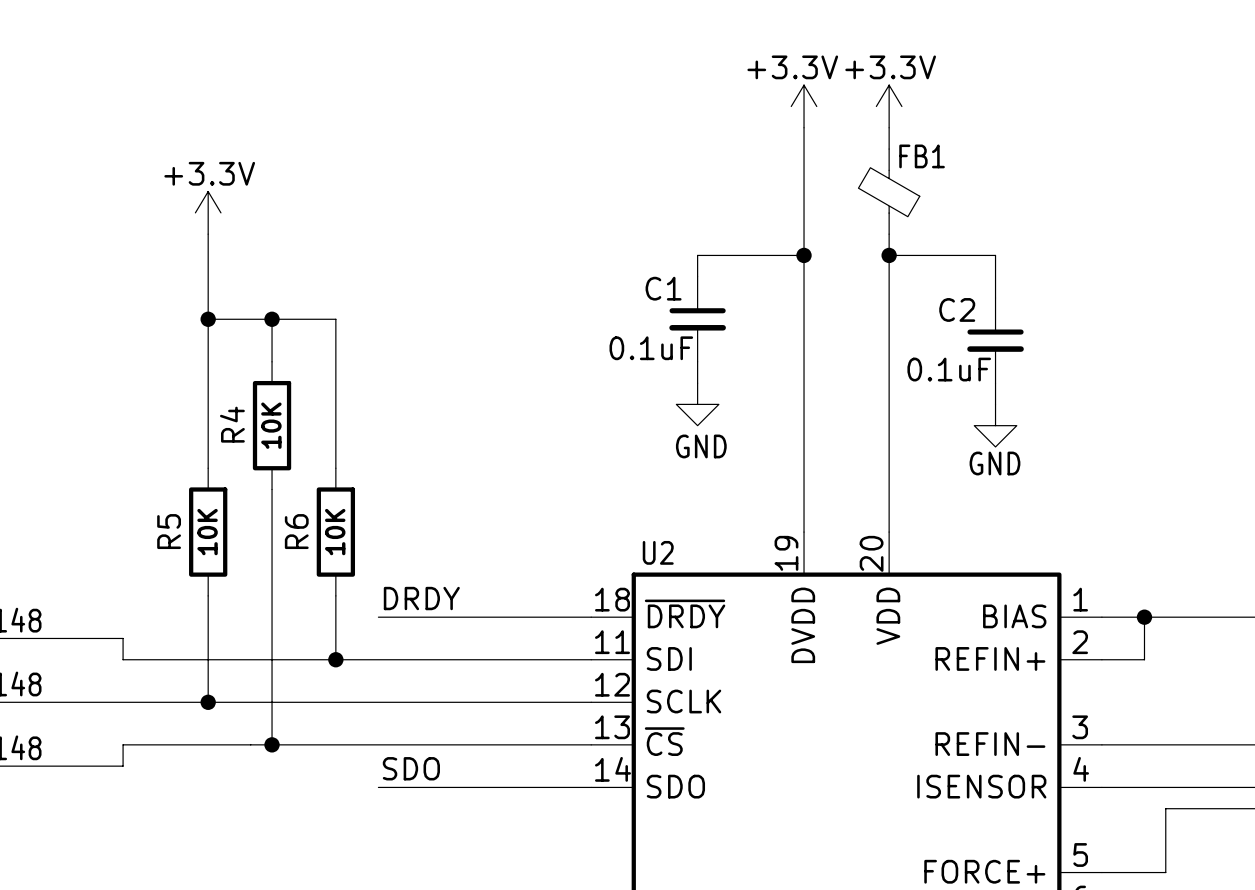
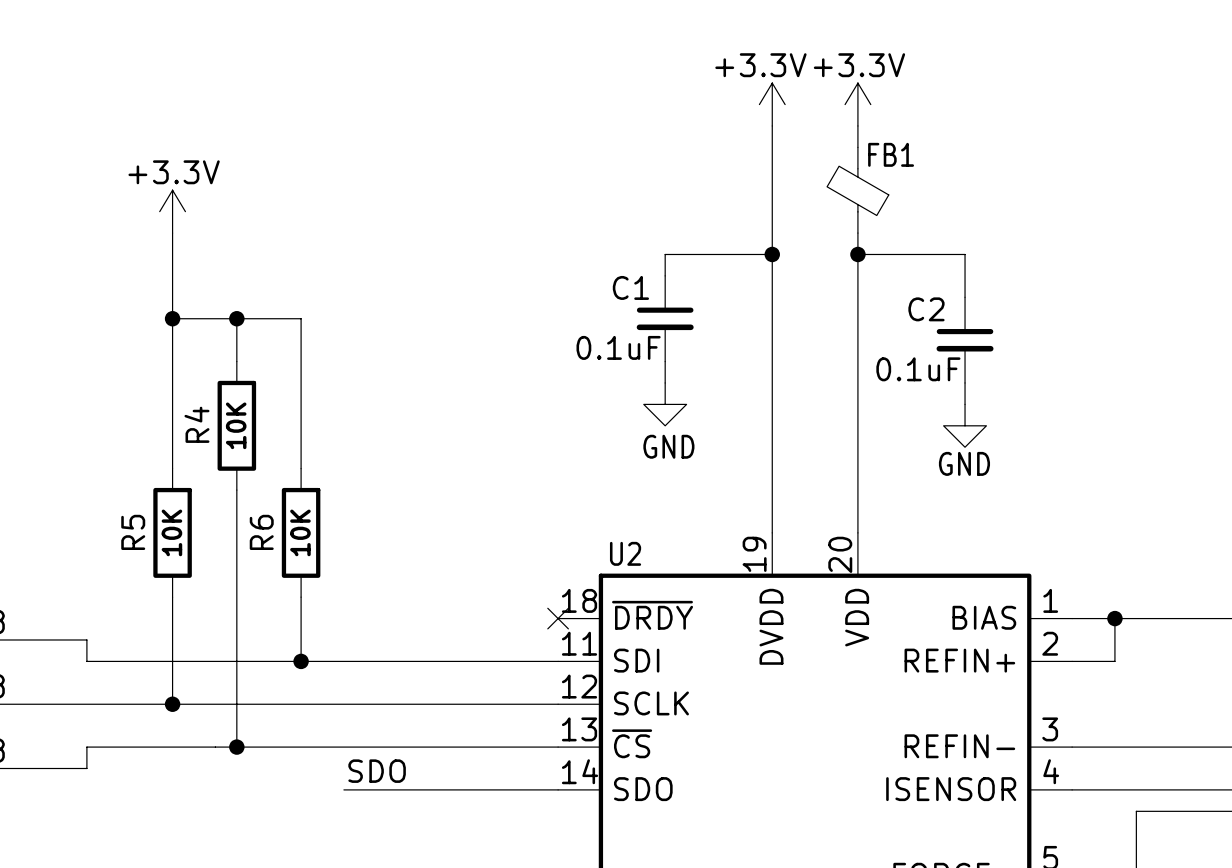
label: DRDY (421, 598) -> none
wire: (378, 617) (591, 617) -> none
no-connect mark: none -> (558, 618)

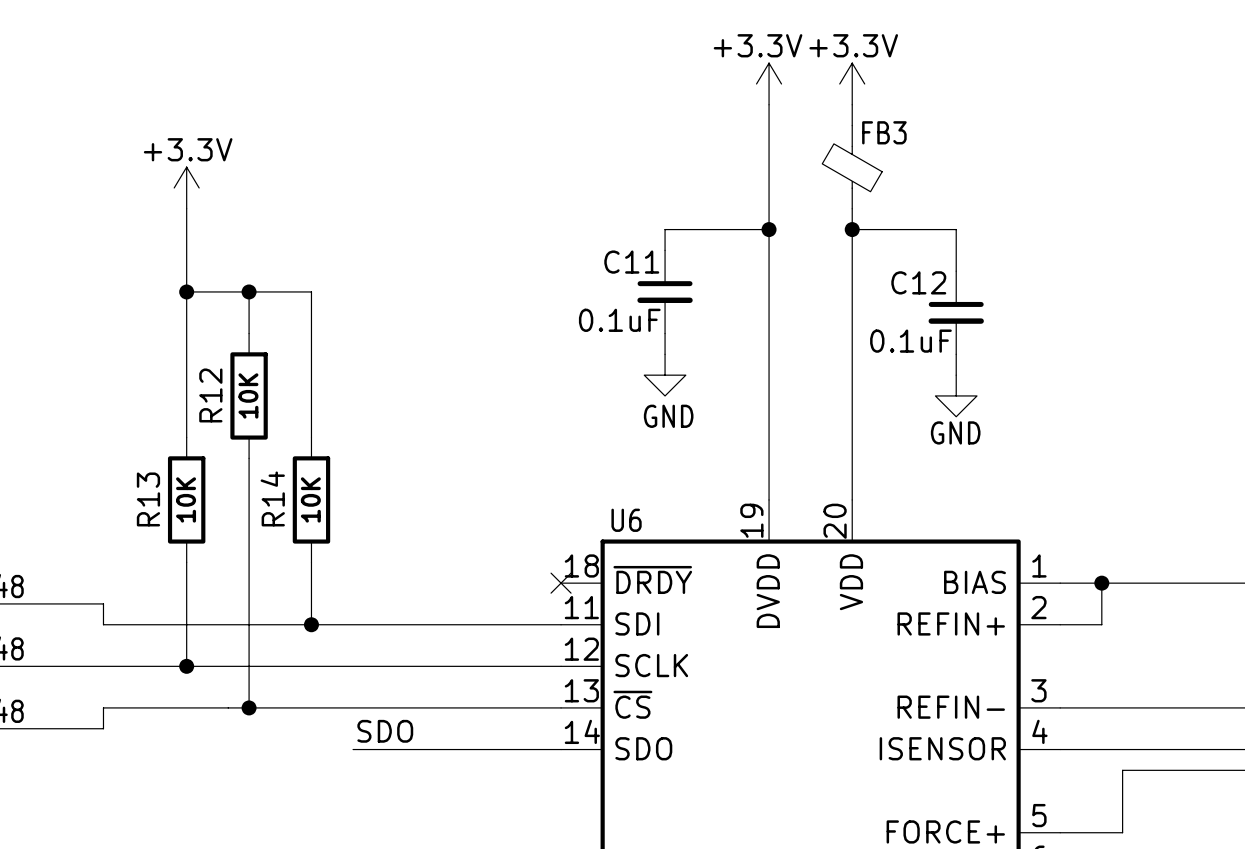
FB1 name: FB1 (891, 154) -> FB3 (884, 132)
C1 name: C1 (630, 287) -> C11 (631, 262)
C2 name: C2 (926, 309) -> C12 (918, 282)
R4 name: R4 (196, 424) -> R12 (210, 395)
R5 name: R5 (133, 532) -> R13 (148, 499)
R6 name: R6 (261, 532) -> R14 (272, 498)
U2 name: U2 (625, 553) -> U6 (626, 520)

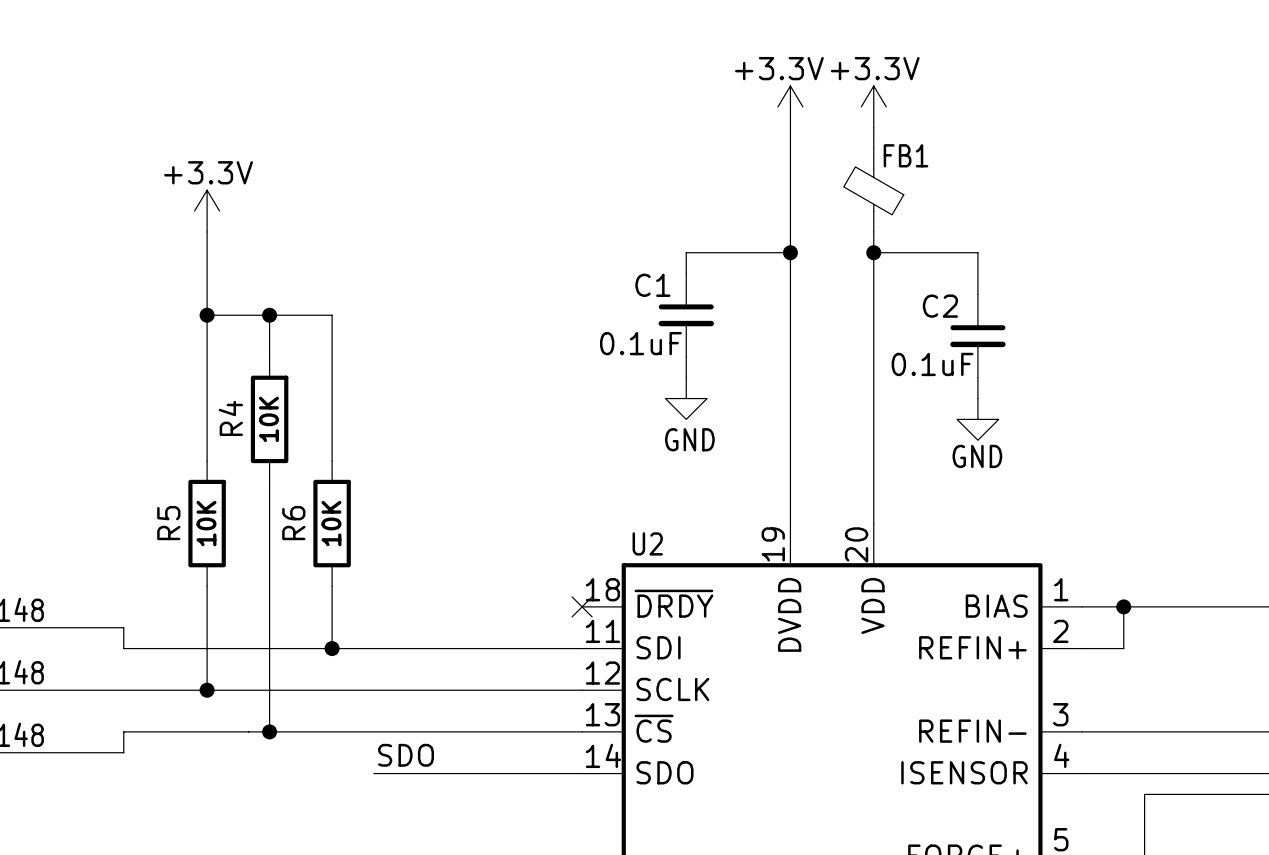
FB3 name: FB3 (884, 132) -> FB1 (906, 155)
C11 name: C11 (631, 262) -> C1 (652, 285)
C12 name: C12 (918, 282) -> C2 (940, 306)
R12 name: R12 (210, 395) -> R4 (230, 418)
R14 name: R14 (272, 498) -> R6 (293, 523)
R13 name: R13 (148, 499) -> R5 (168, 523)
U6 name: U6 (626, 520) -> U2 (647, 543)

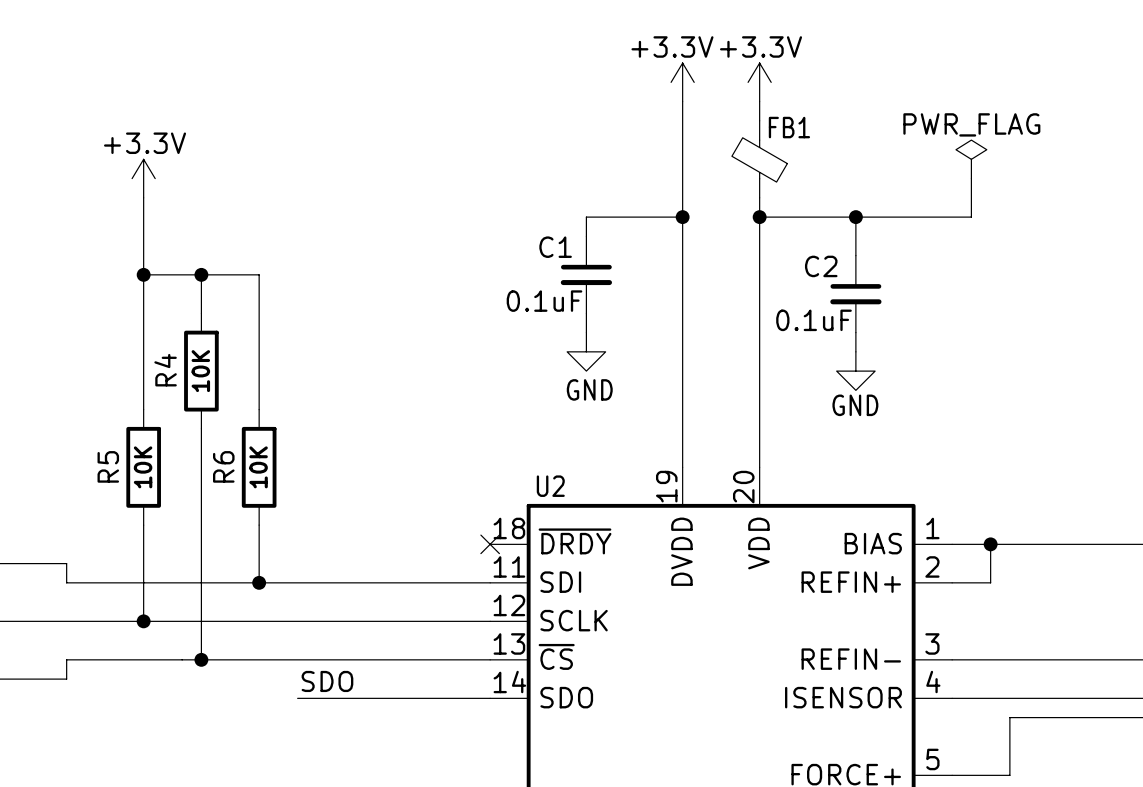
power symbol: none -> PWR_FLAG (971, 159)
wire: none -> (971, 178) (971, 217) (855, 217)
junction: none -> (855, 217)

